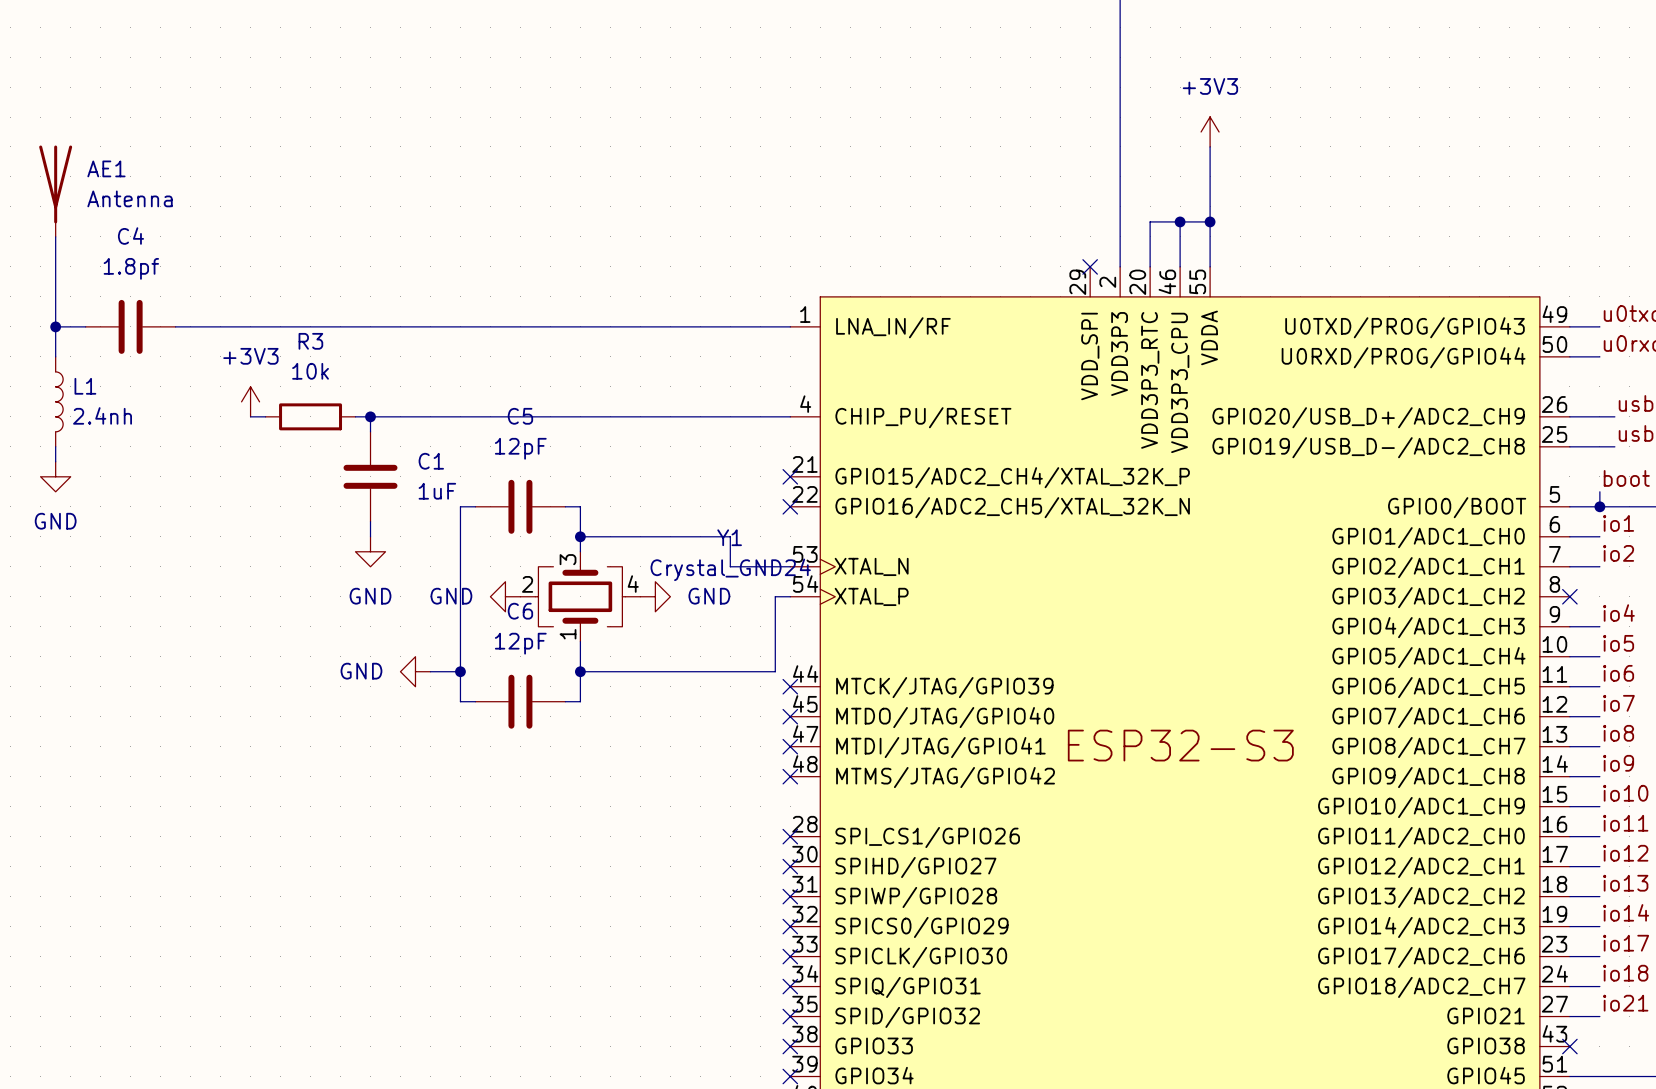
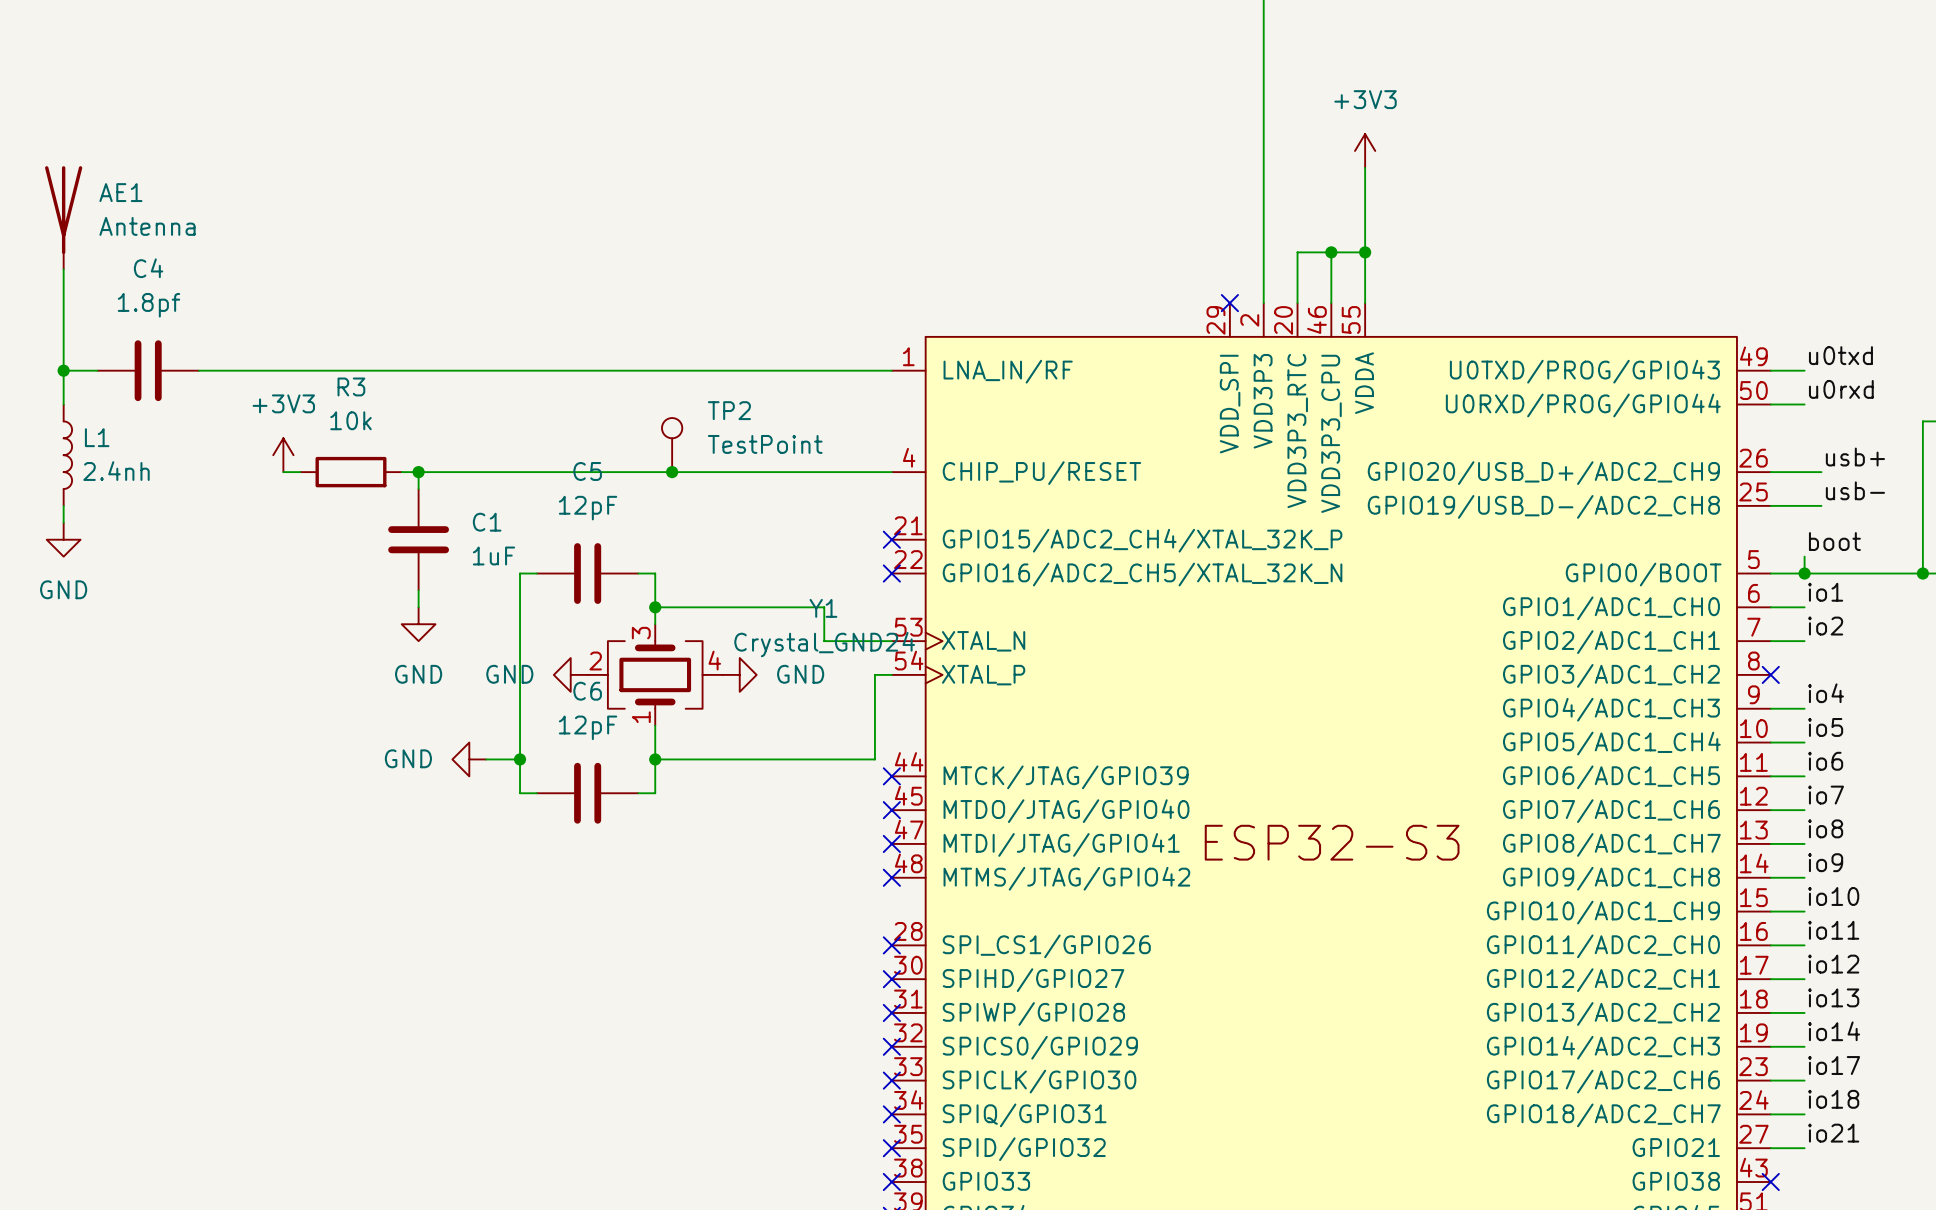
TP2: none -> TestPoint (672, 445)
junction: none -> (672, 472)

